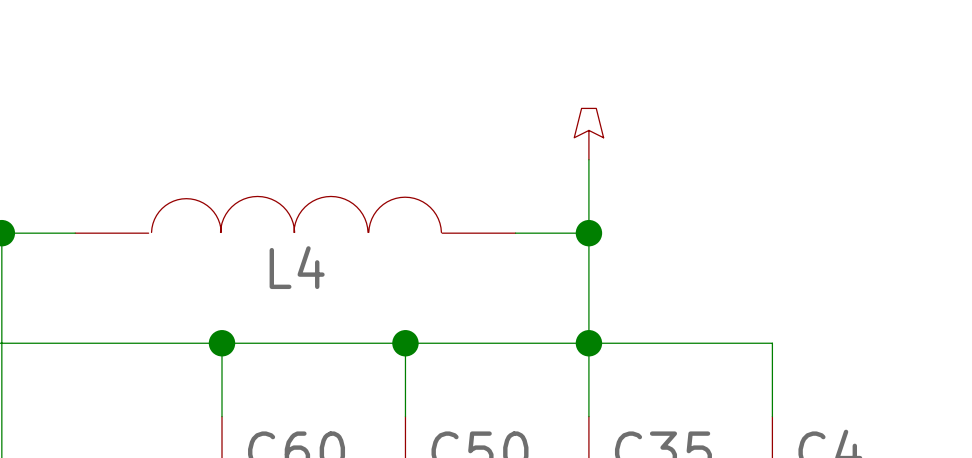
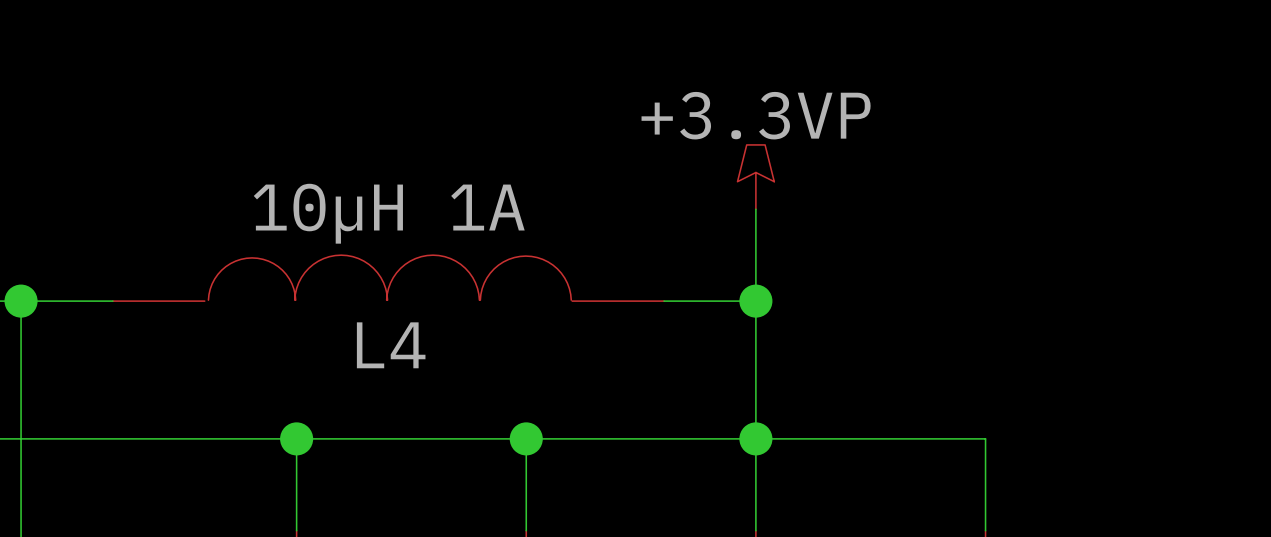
power symbol text: none -> +3.3VP (756, 115)
L4 value: none -> 10µH 1A (389, 213)

